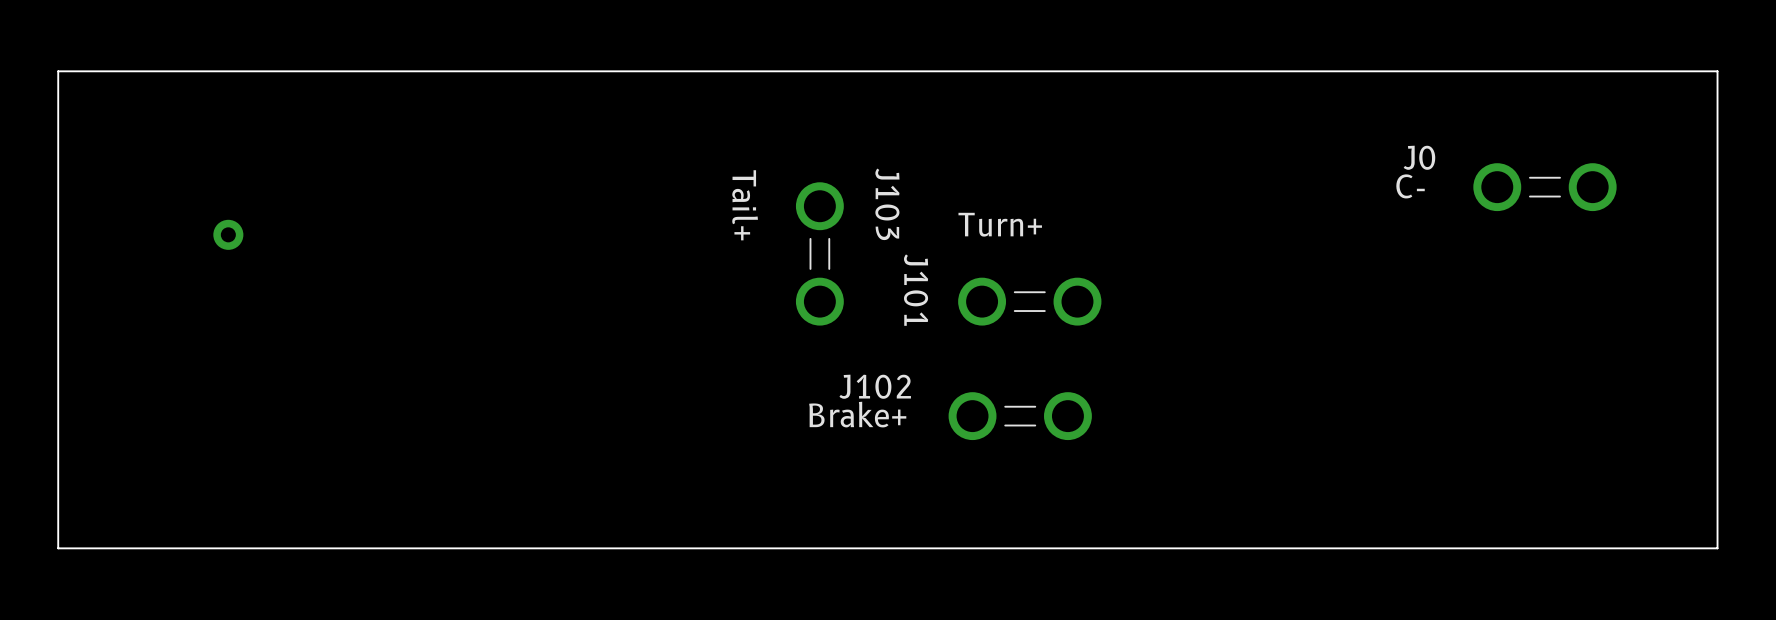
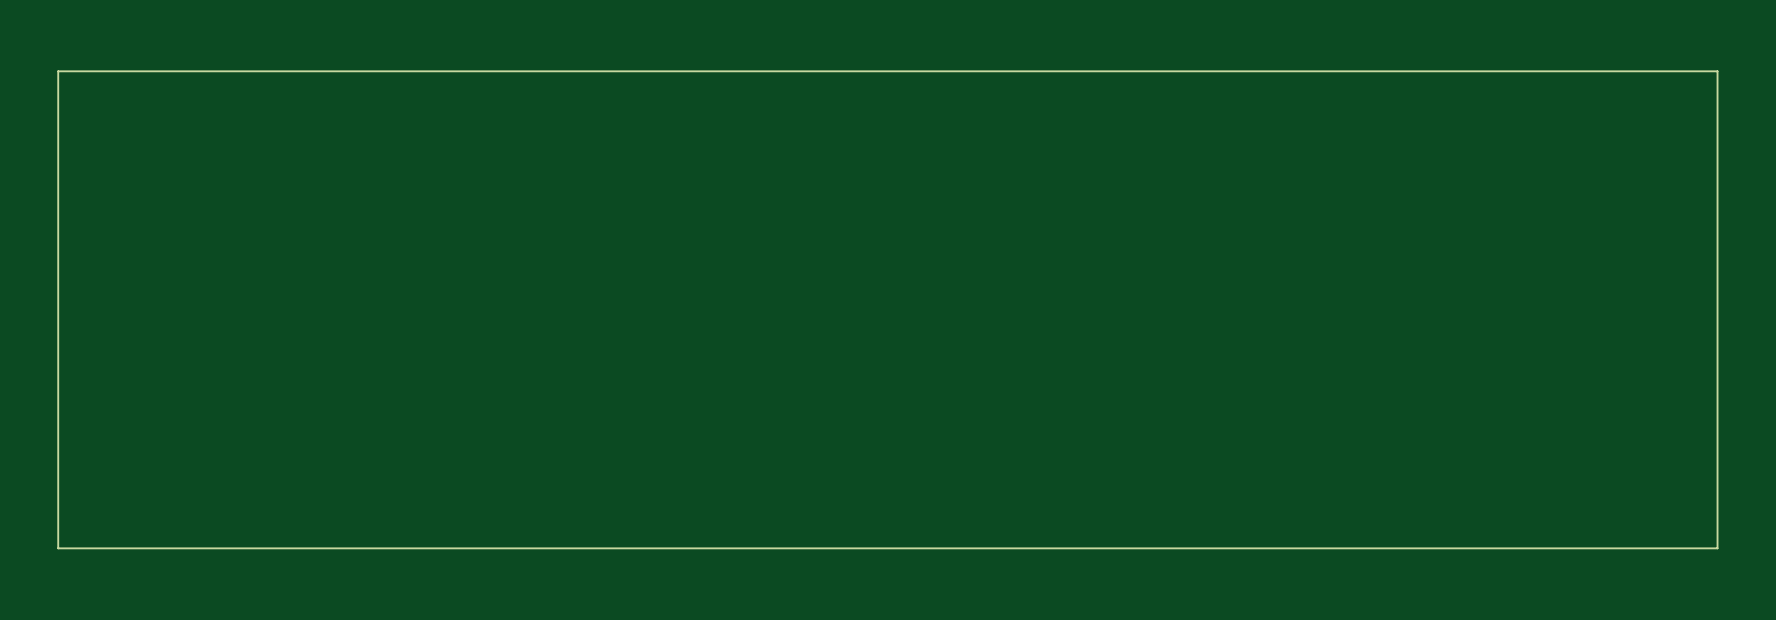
J0: C- (1544, 187) -> none
via: (228, 234) -> none
J103: Tail+ (819, 253) -> none
J101: Turn+ (1029, 301) -> none
J102: Brake+ (1020, 416) -> none

